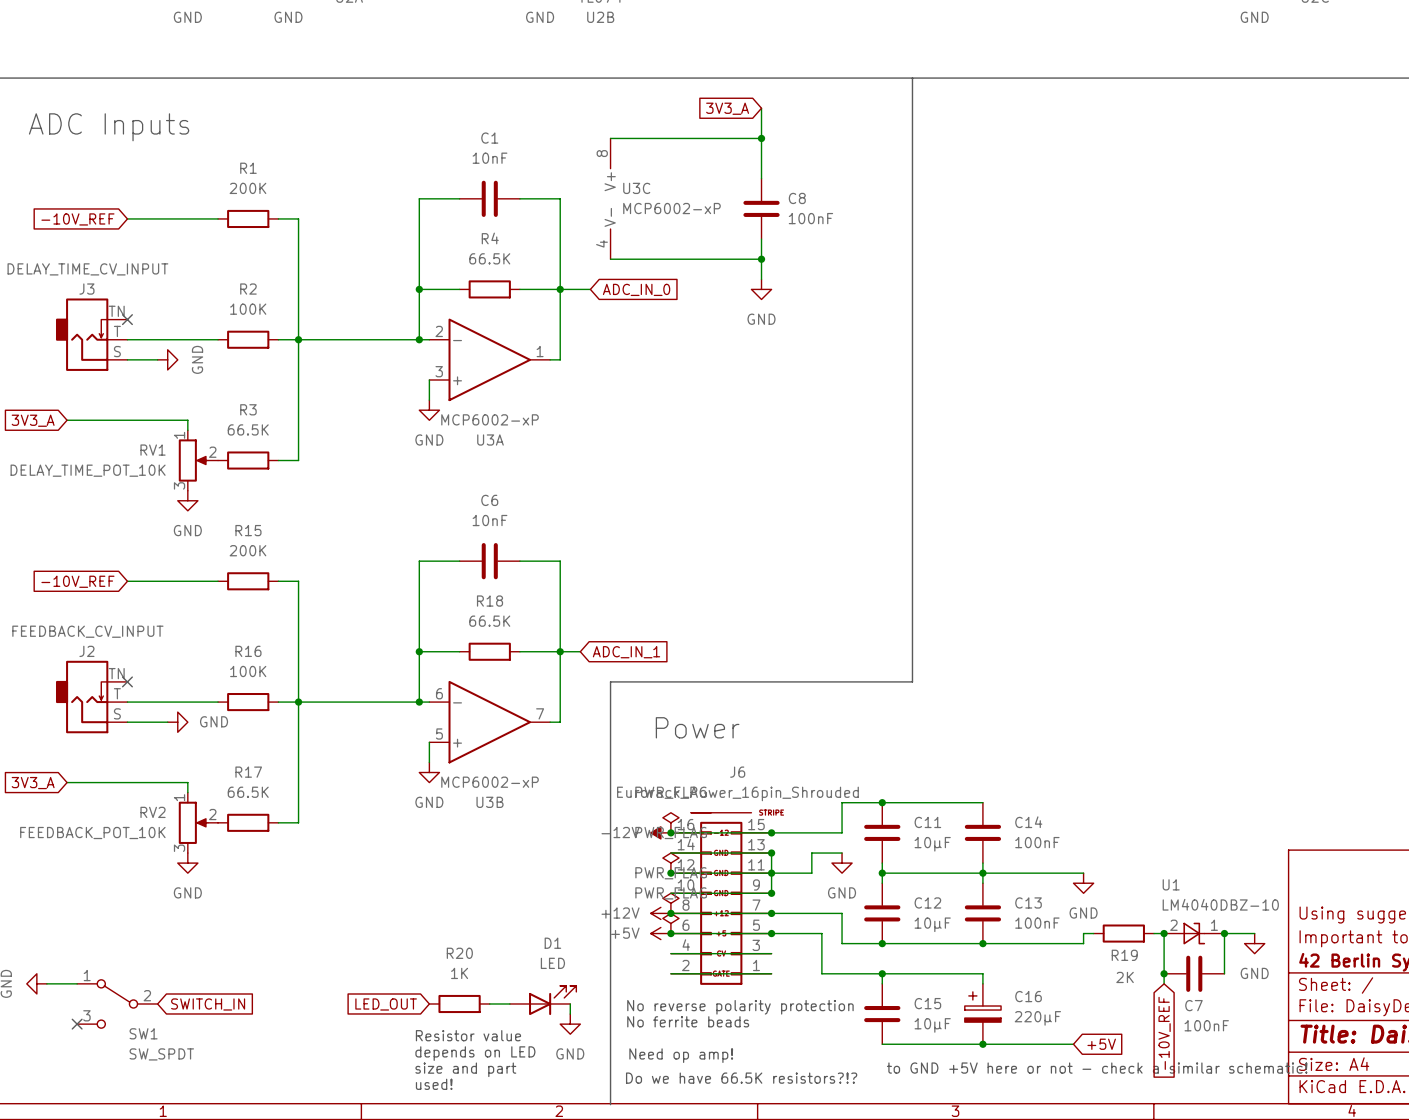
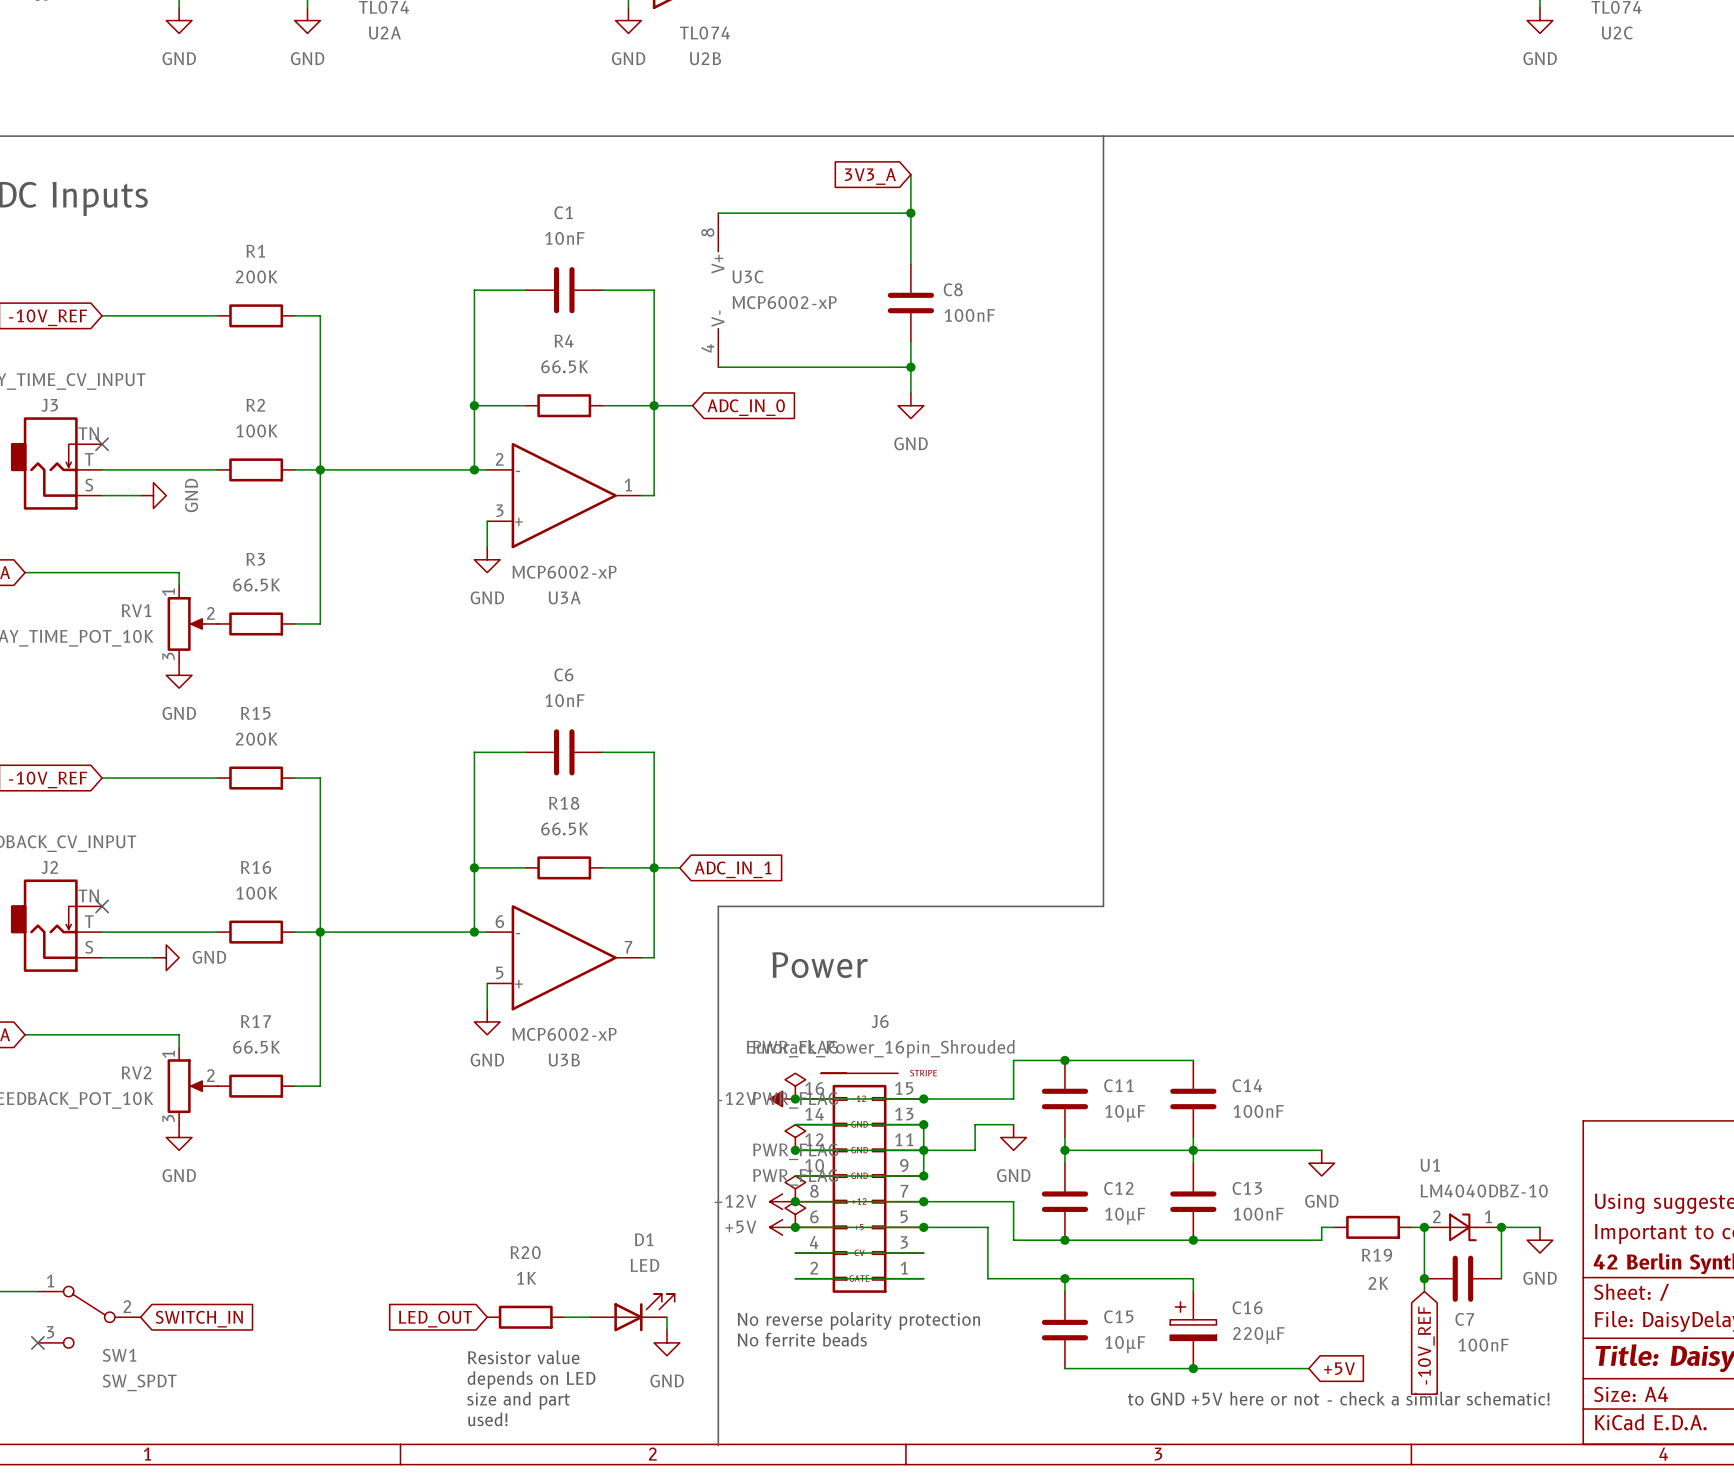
text: Need op amp! (681, 1055) -> none
text: Do we have 66.5K resistors?!? (741, 1078) -> none

